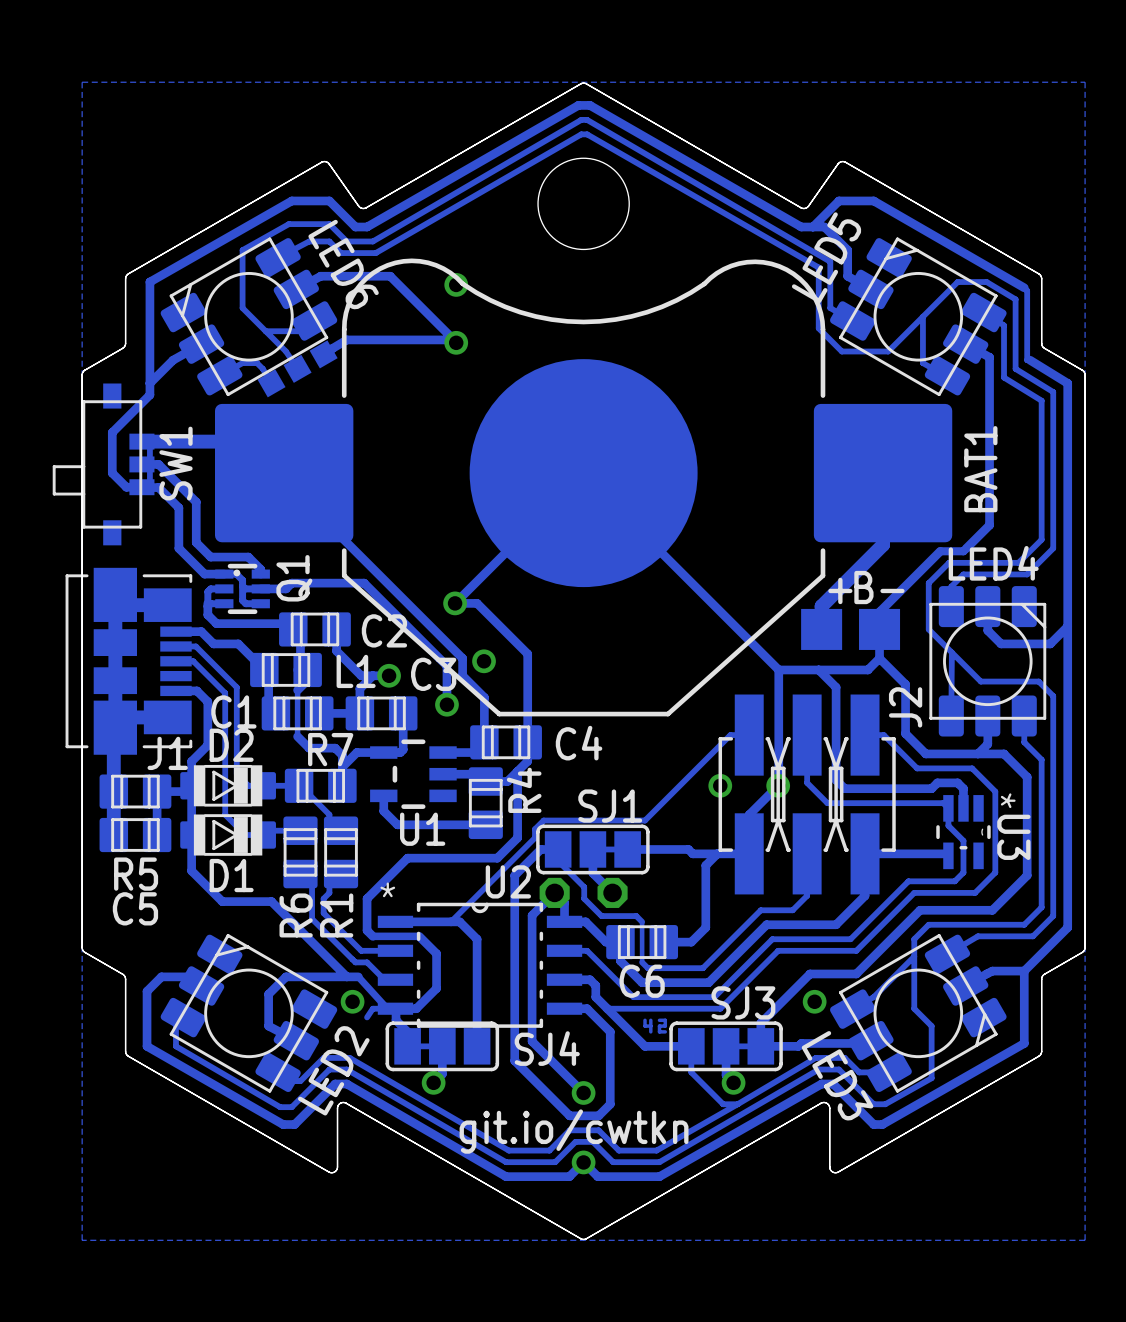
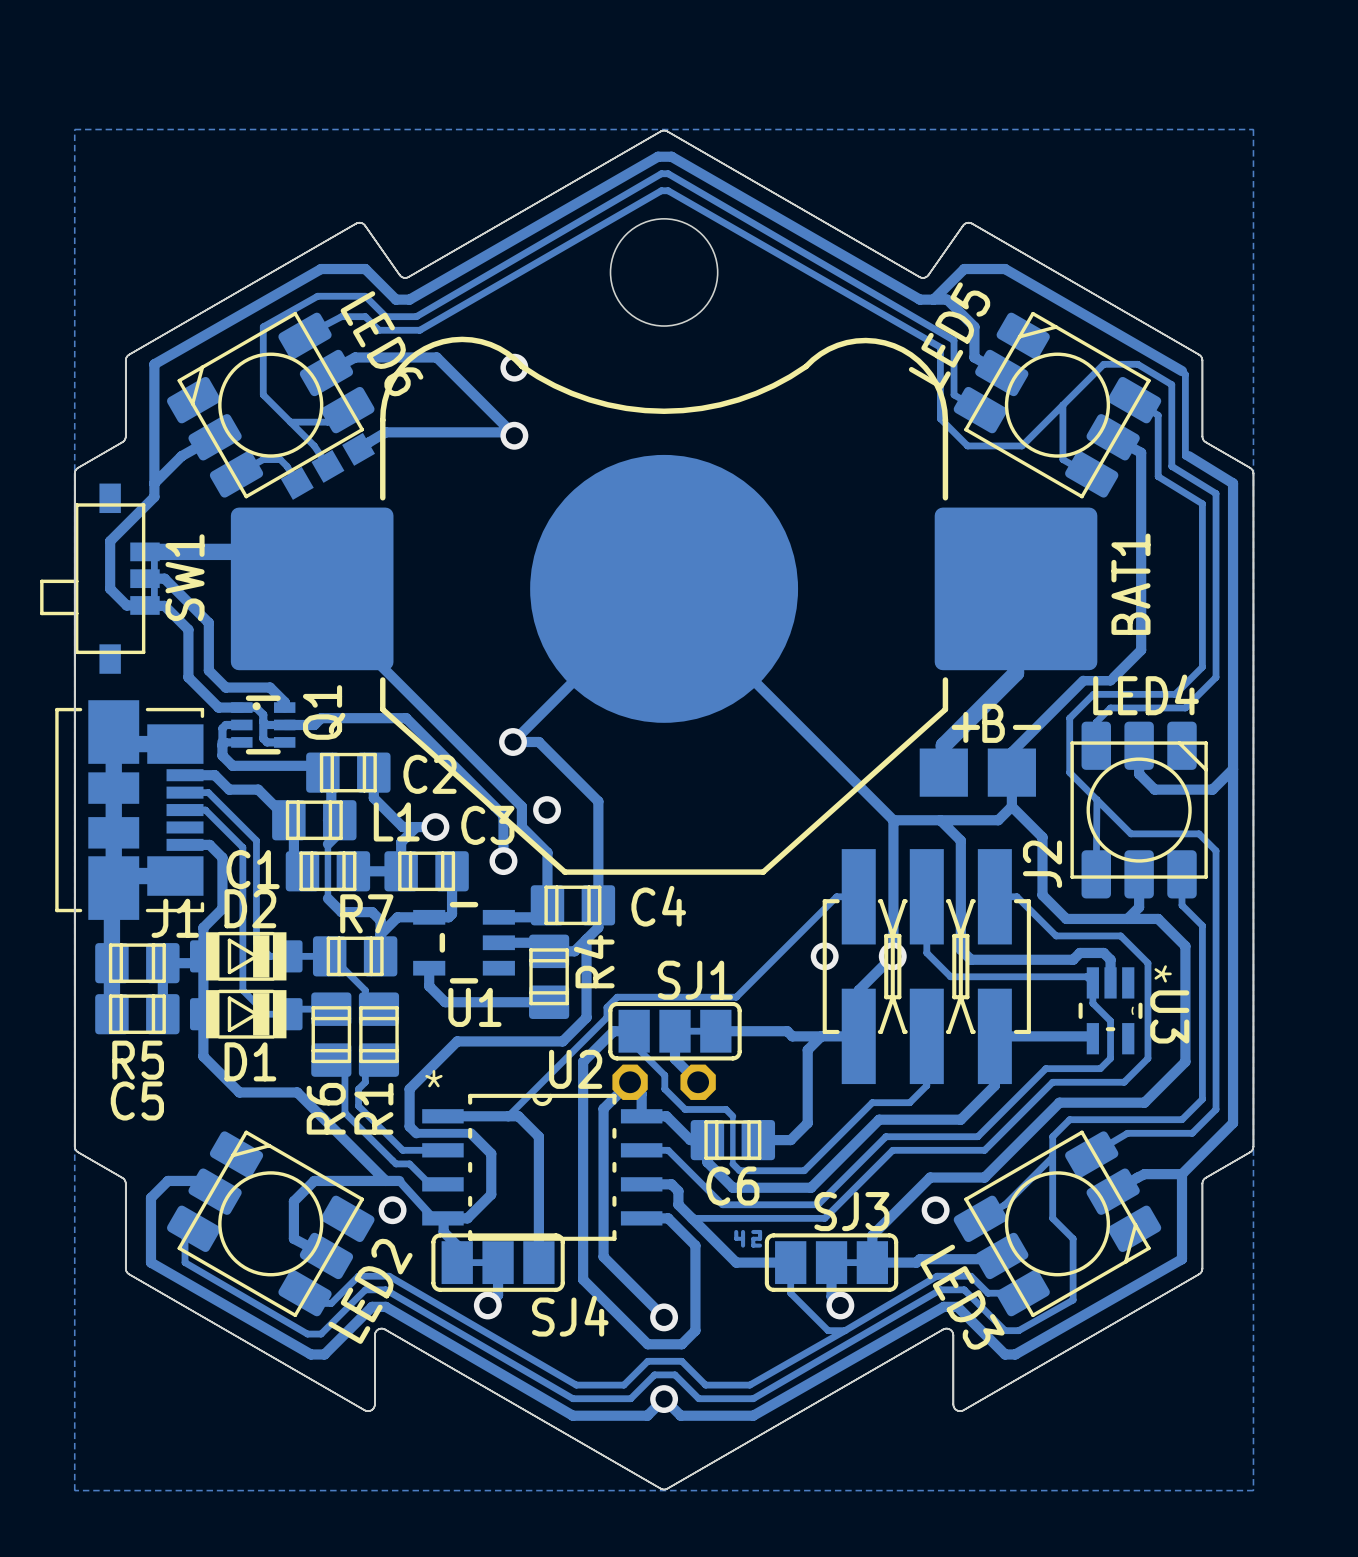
track: (381, 1008) (372, 1008) (367, 1017) -> none
SJ4 name position: SJ4 (547, 1048) -> SJ4 (570, 1316)
text: git.io/cwtkn (574, 1131) -> none

